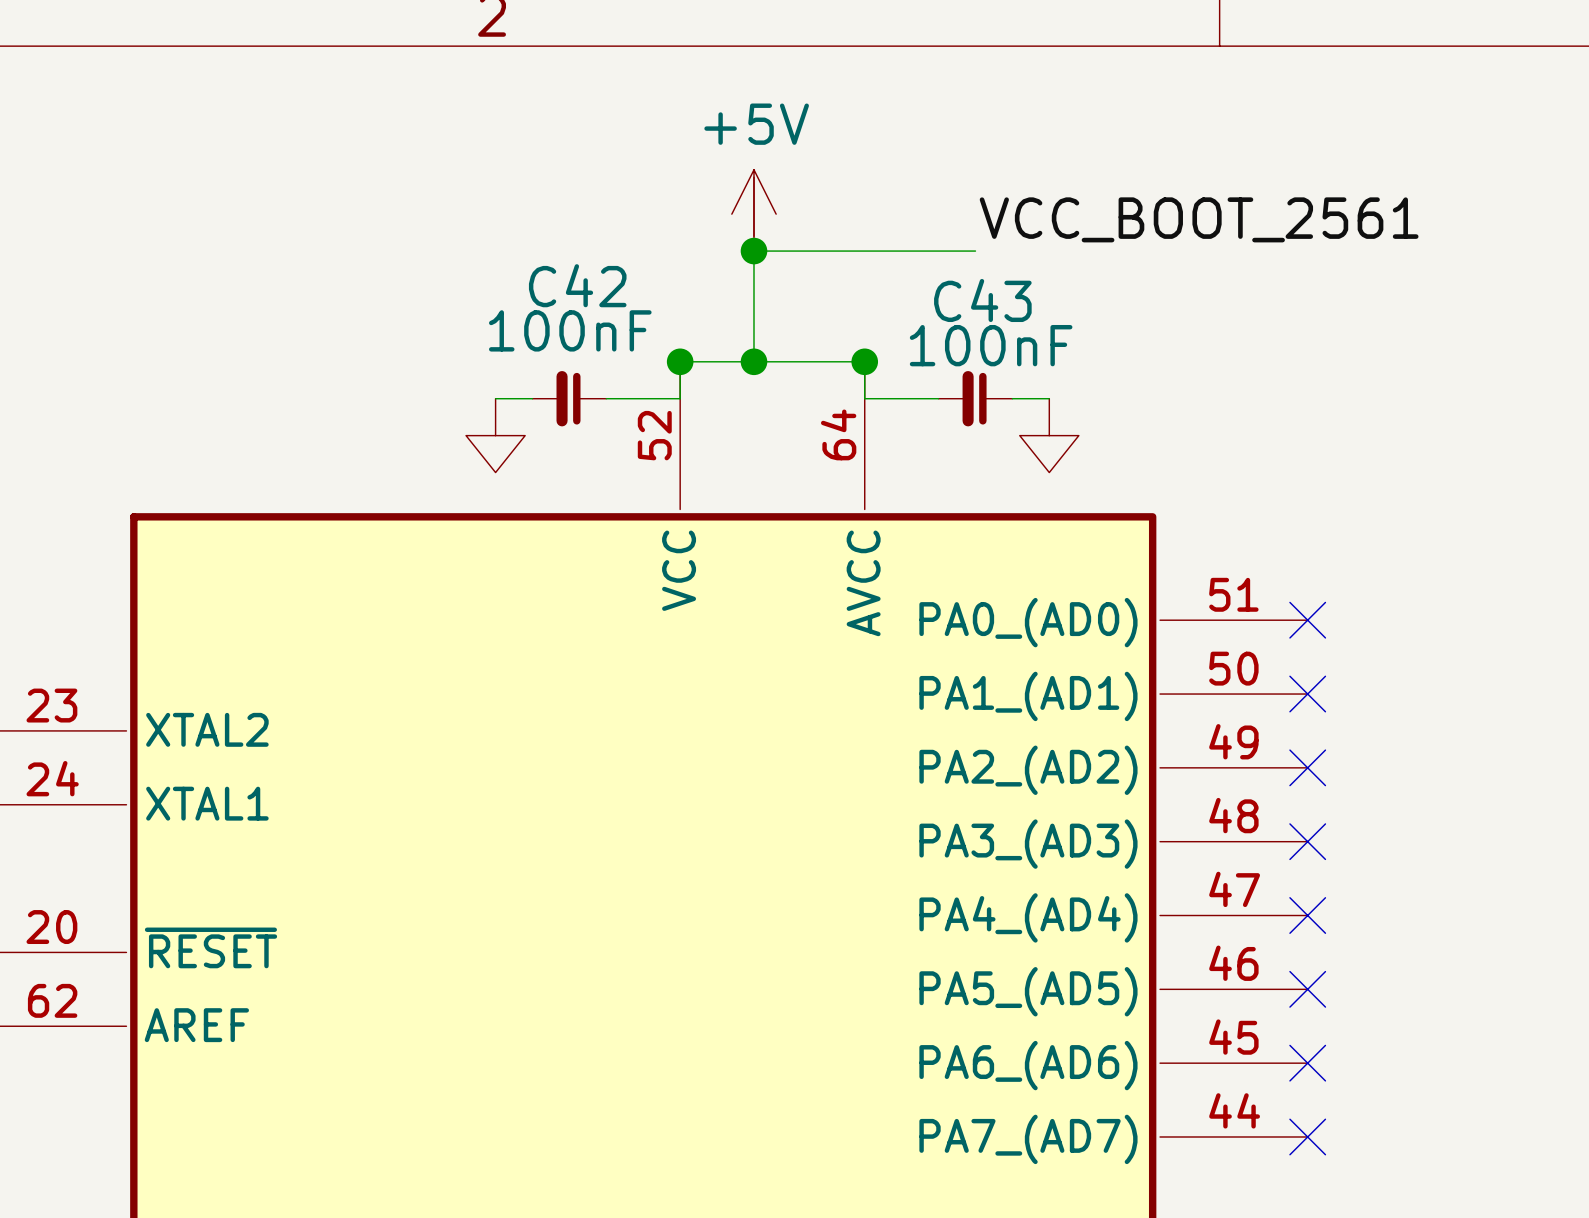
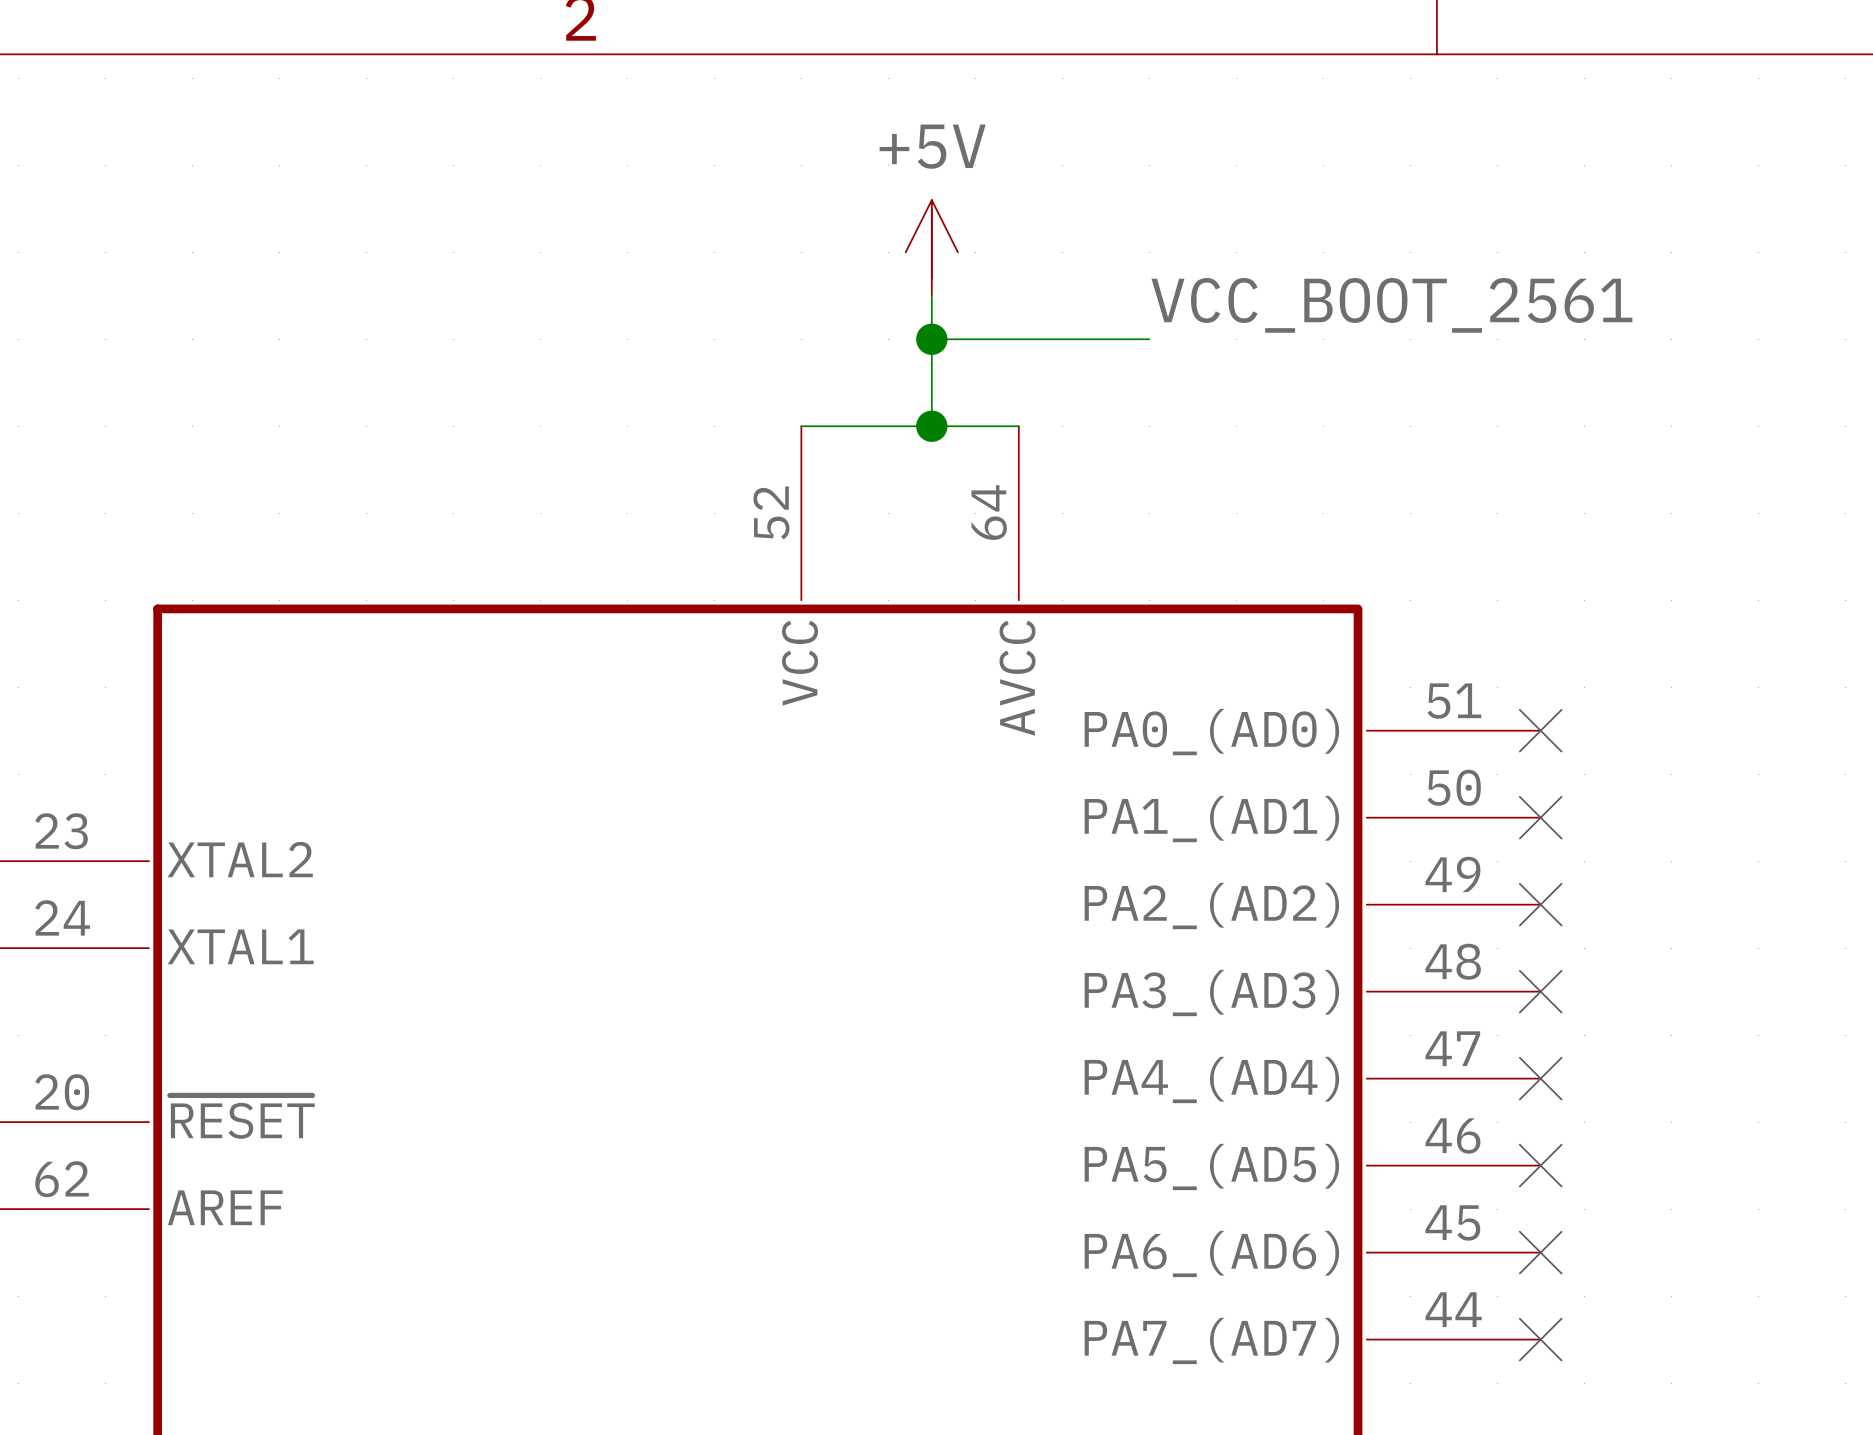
power symbol position: +5V (753, 210) -> +5V (931, 247)
label position: VCC_BOOT_2561 (1199, 219) -> VCC_BOOT_2561 (1391, 305)
junction: (753, 251) -> none
wire: none -> (931, 295) (931, 426)
wire: (975, 251) (753, 251) (753, 361) -> none
wire: none -> (931, 339) (1149, 339)
junction: none -> (931, 339)
wire: (680, 361) (680, 398) (606, 398) -> none
junction: (680, 361) -> none
junction: (753, 361) -> none
junction: none -> (931, 426)
wire: (864, 361) (864, 398) (938, 398) -> none
junction: (864, 361) -> none
wire: (495, 398) (532, 398) -> none
C42: 100nF (569, 398) -> none
C43: 100nF (975, 398) -> none
wire: (1012, 398) (1049, 398) -> none
power symbol: (495, 435) -> none
power symbol: (1049, 435) -> none

